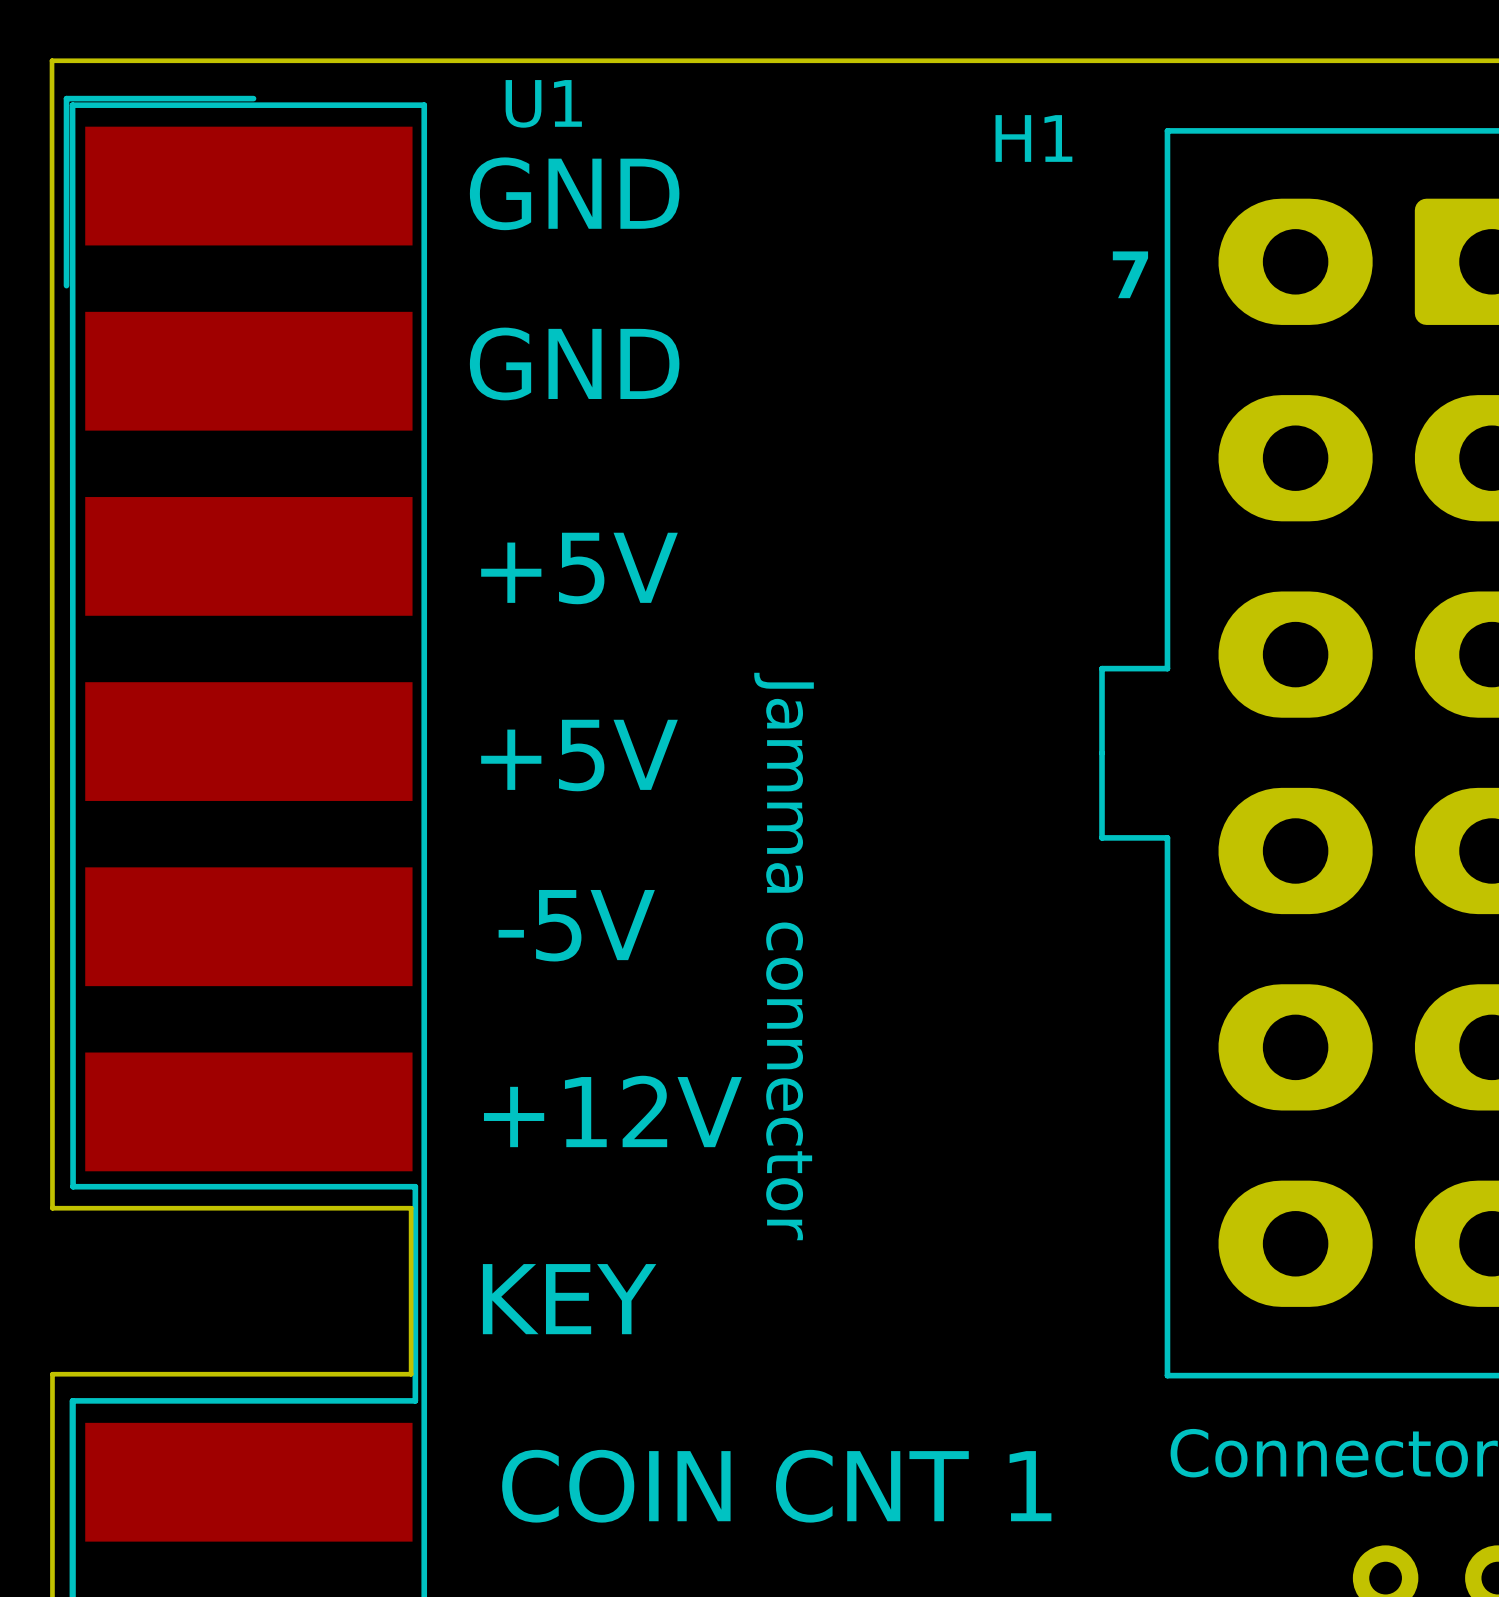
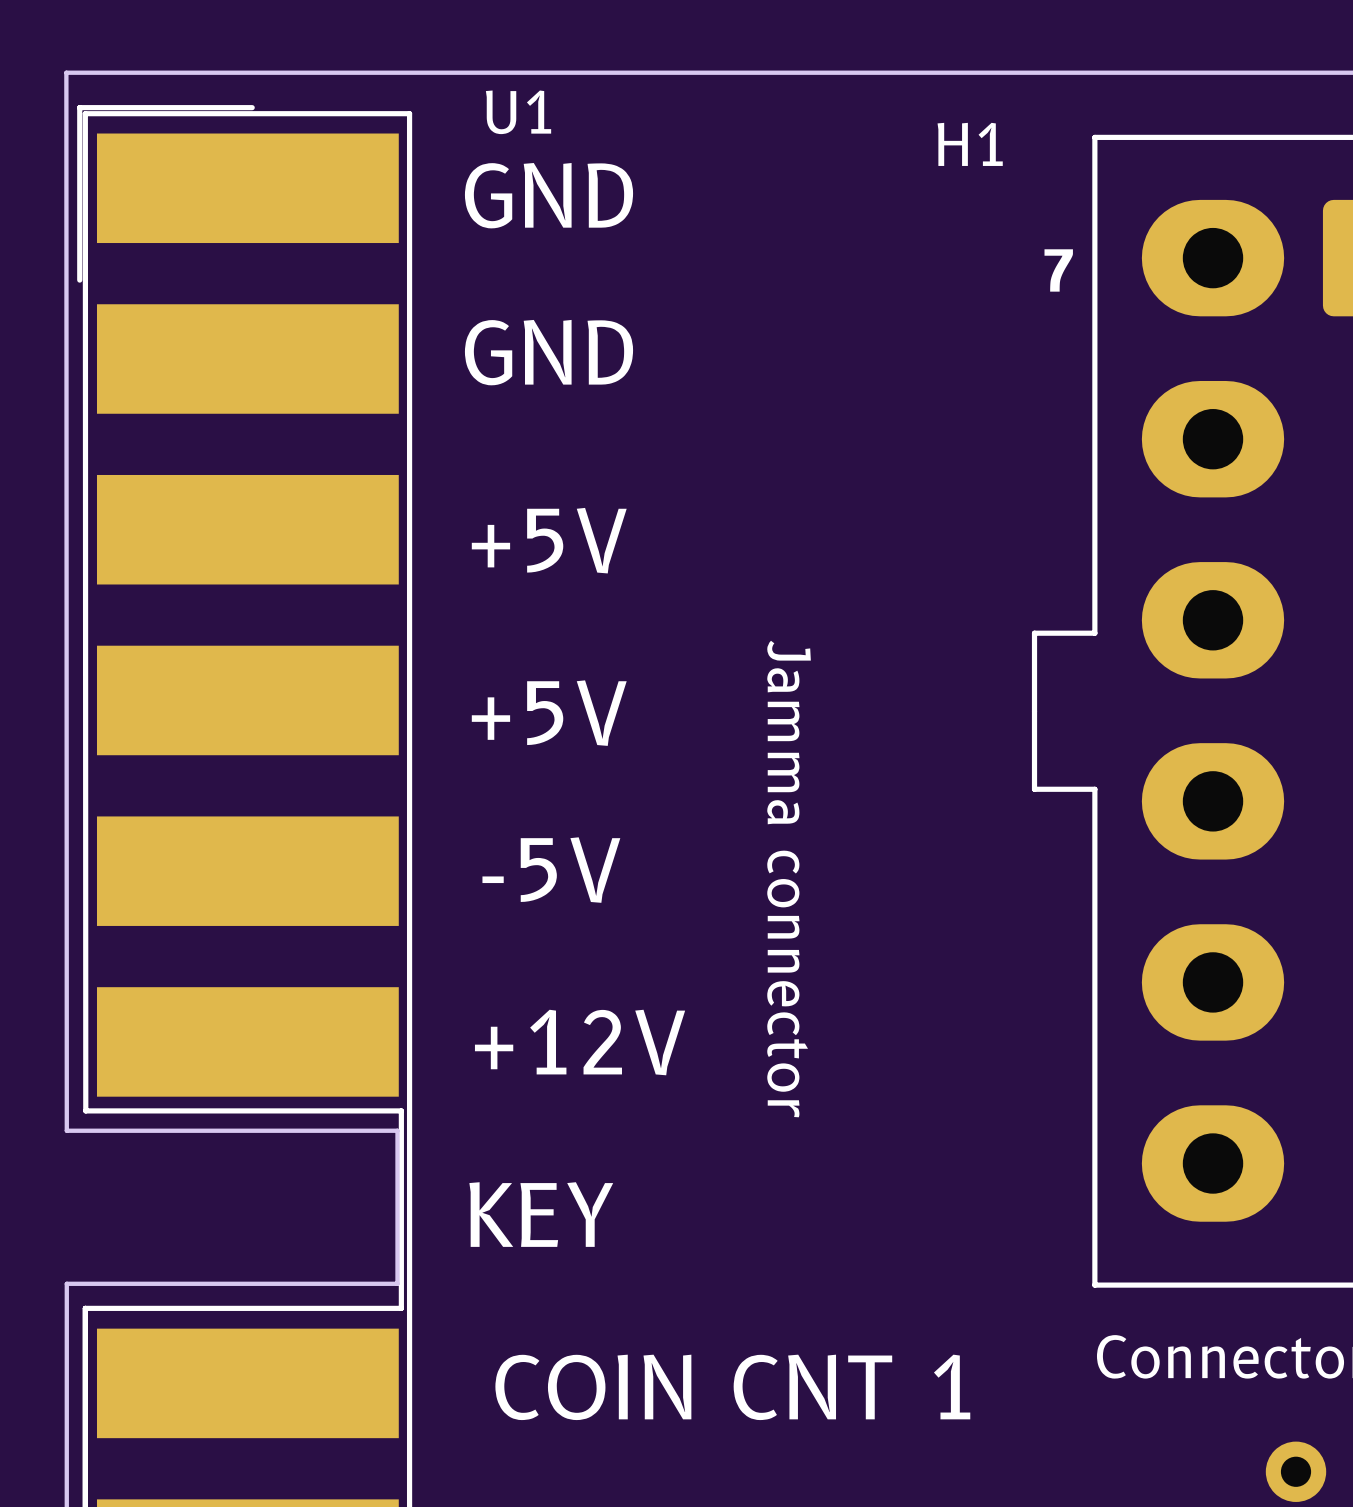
text position: Jamma connector (784, 956) -> Jamma connector (789, 879)

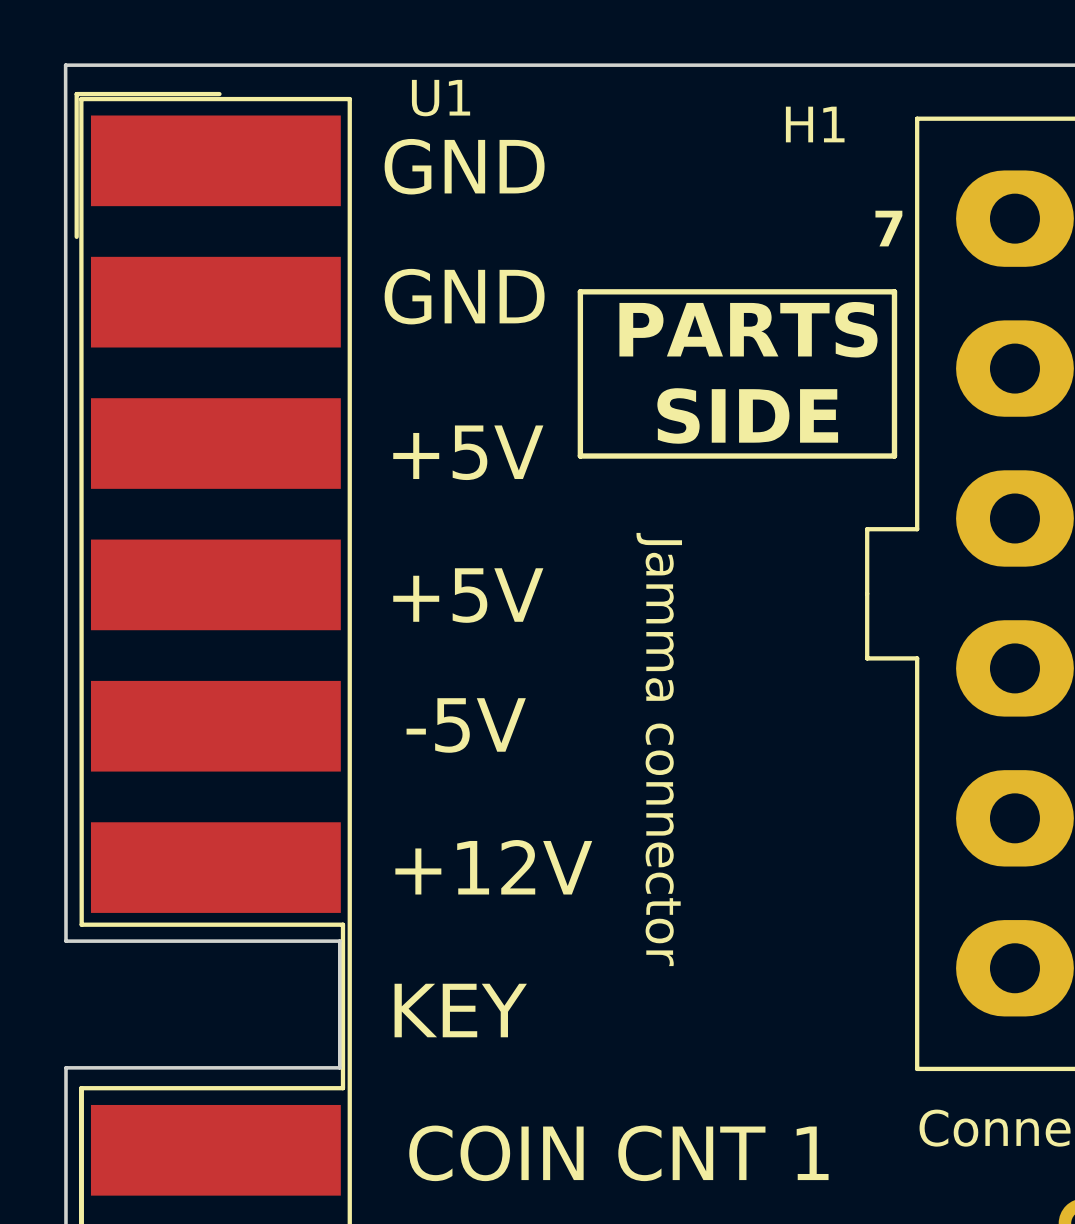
line: none -> (580, 291) (894, 291) (894, 456) (580, 456) (580, 291)
text: none -> PARTS (748, 329)
text: none -> SIDE (747, 415)

